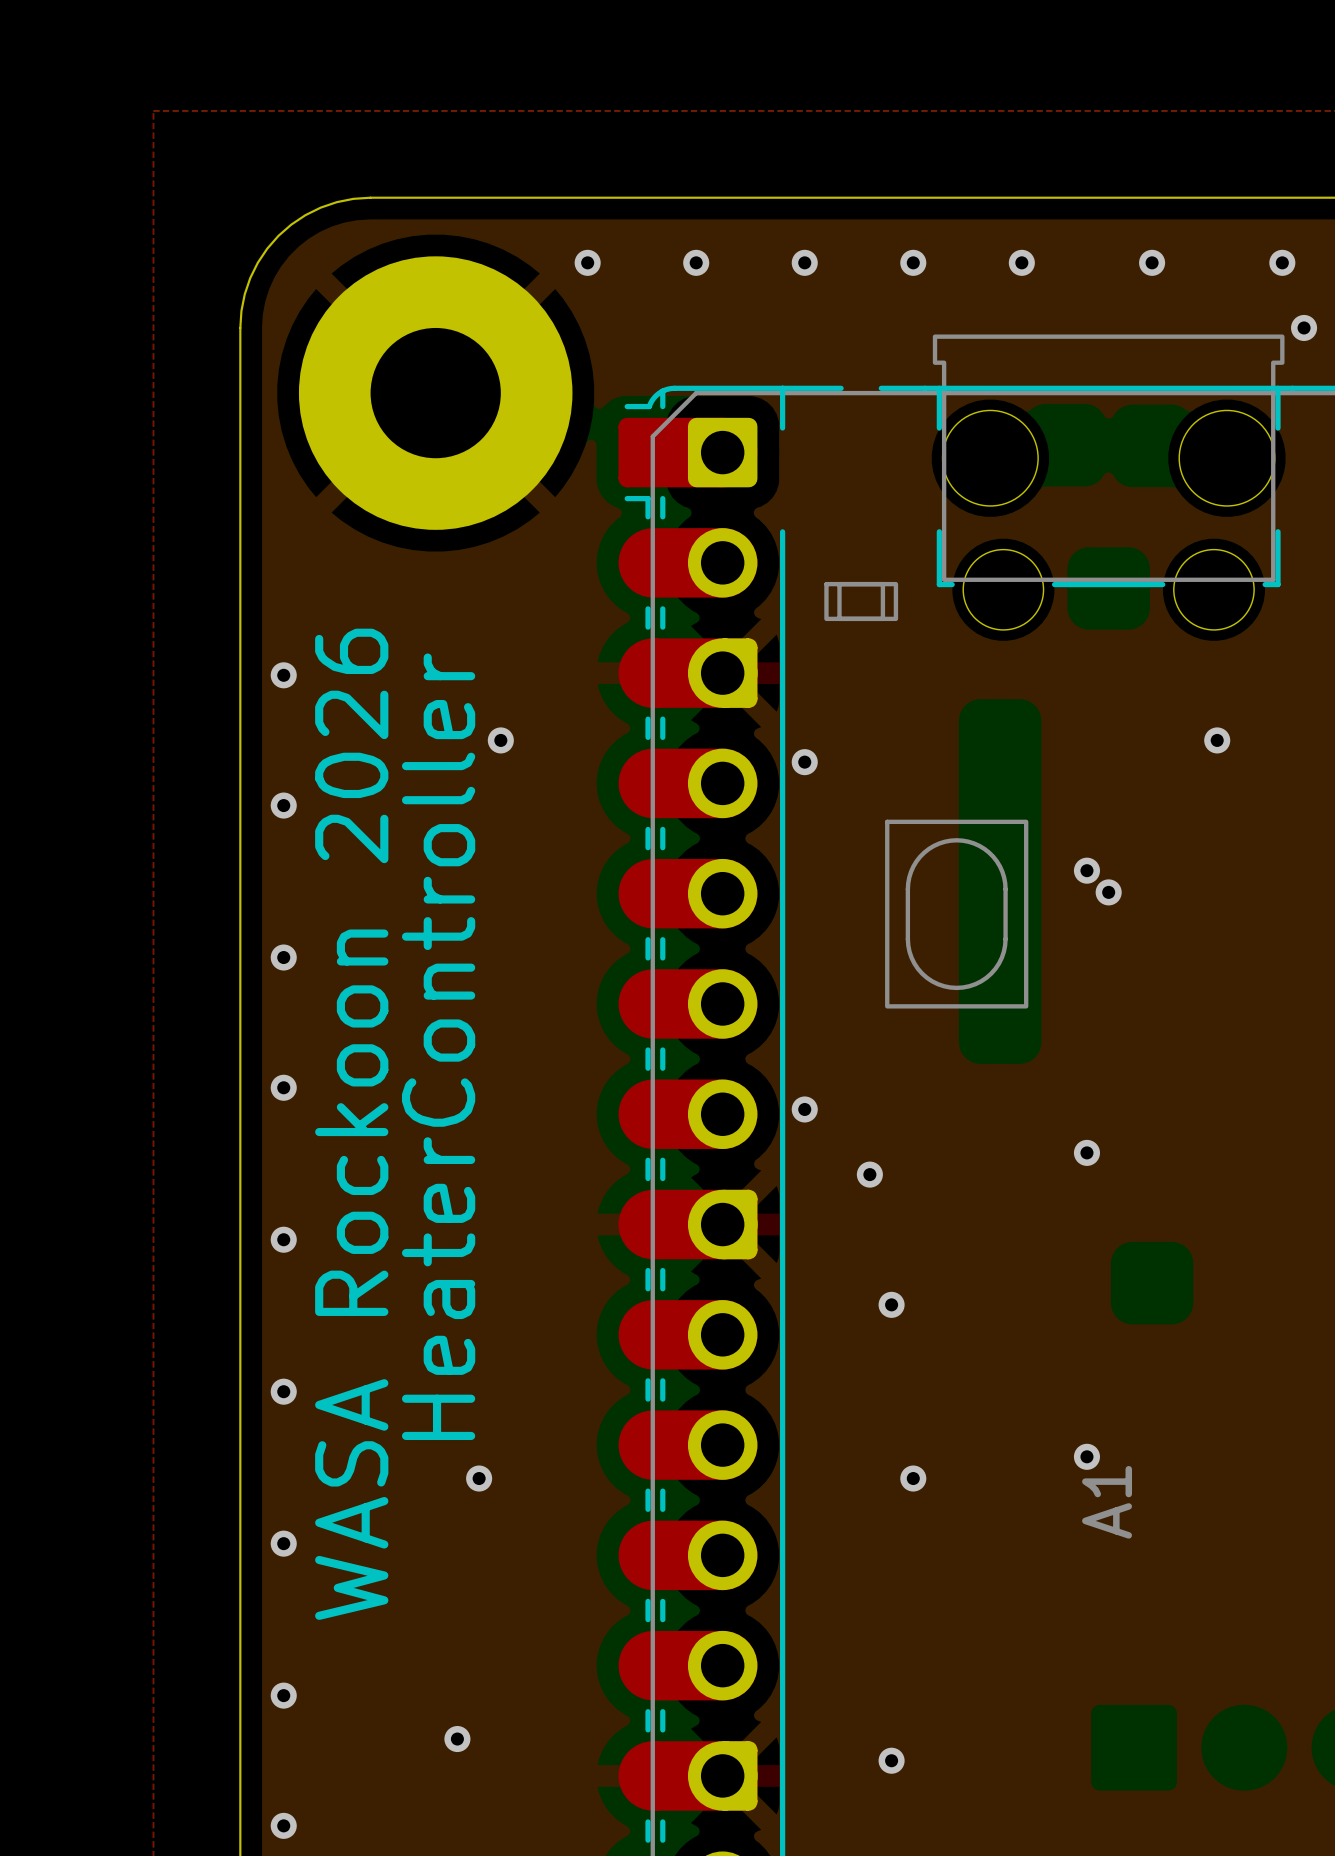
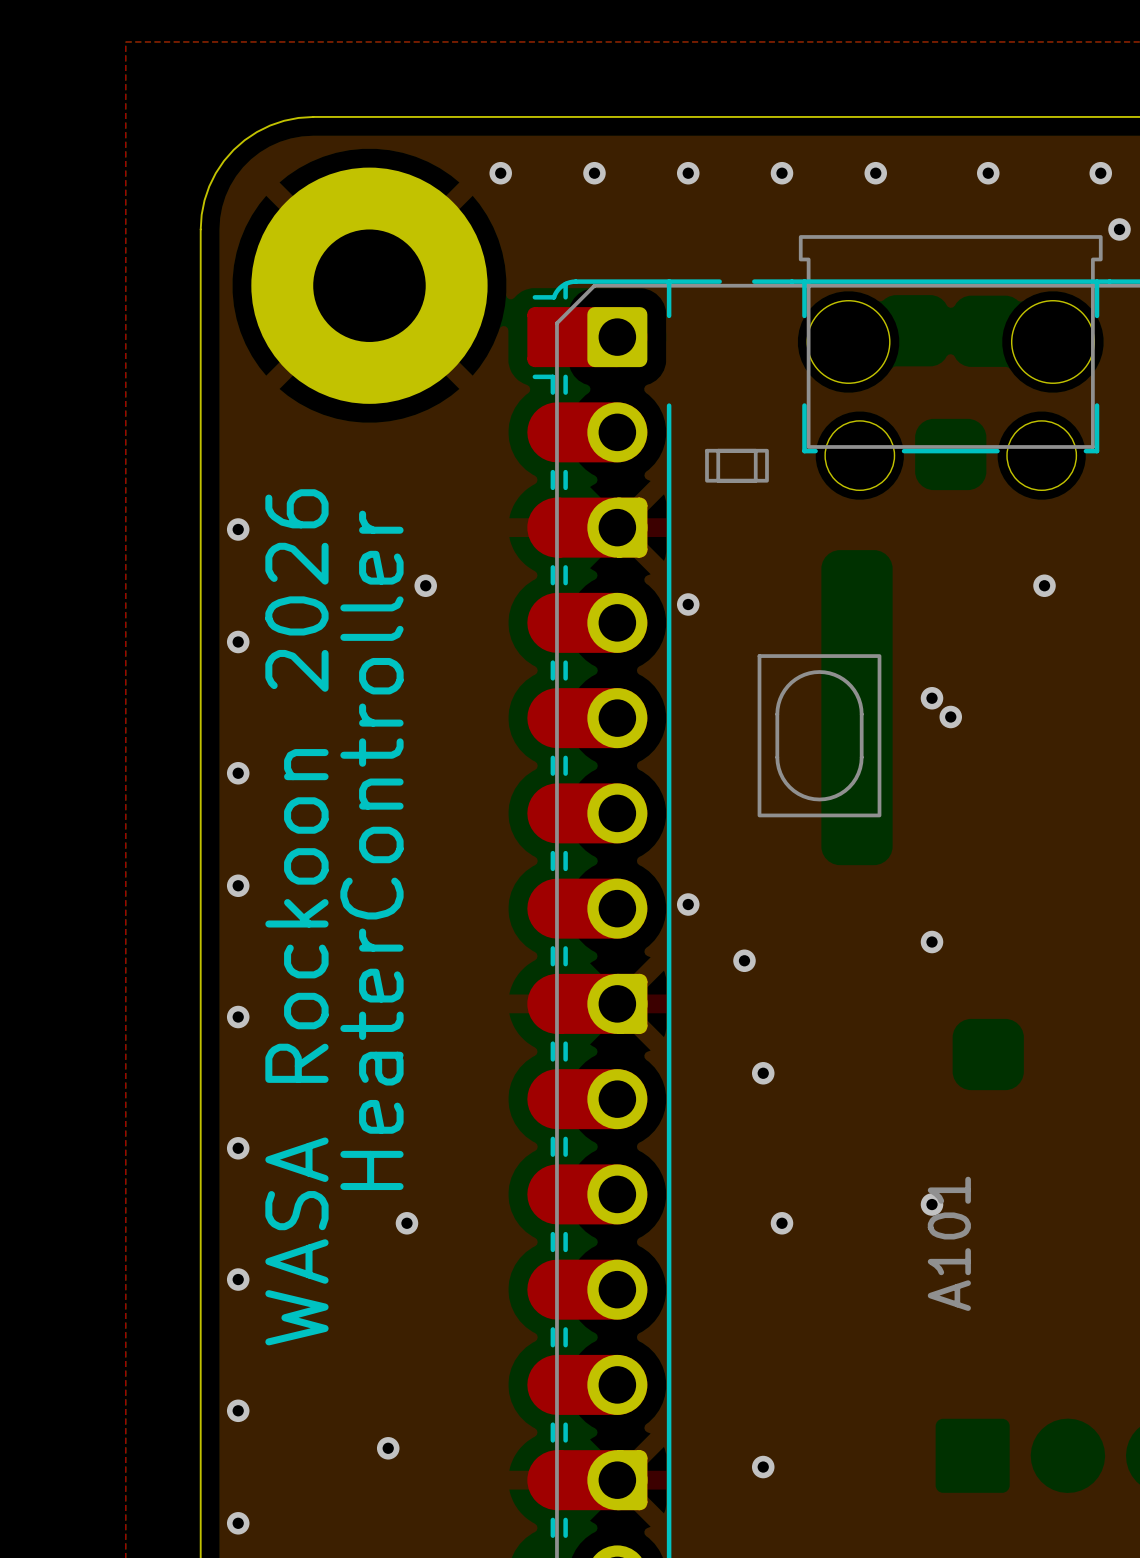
A1 name: A1 (1107, 1502) -> A101 (949, 1243)

